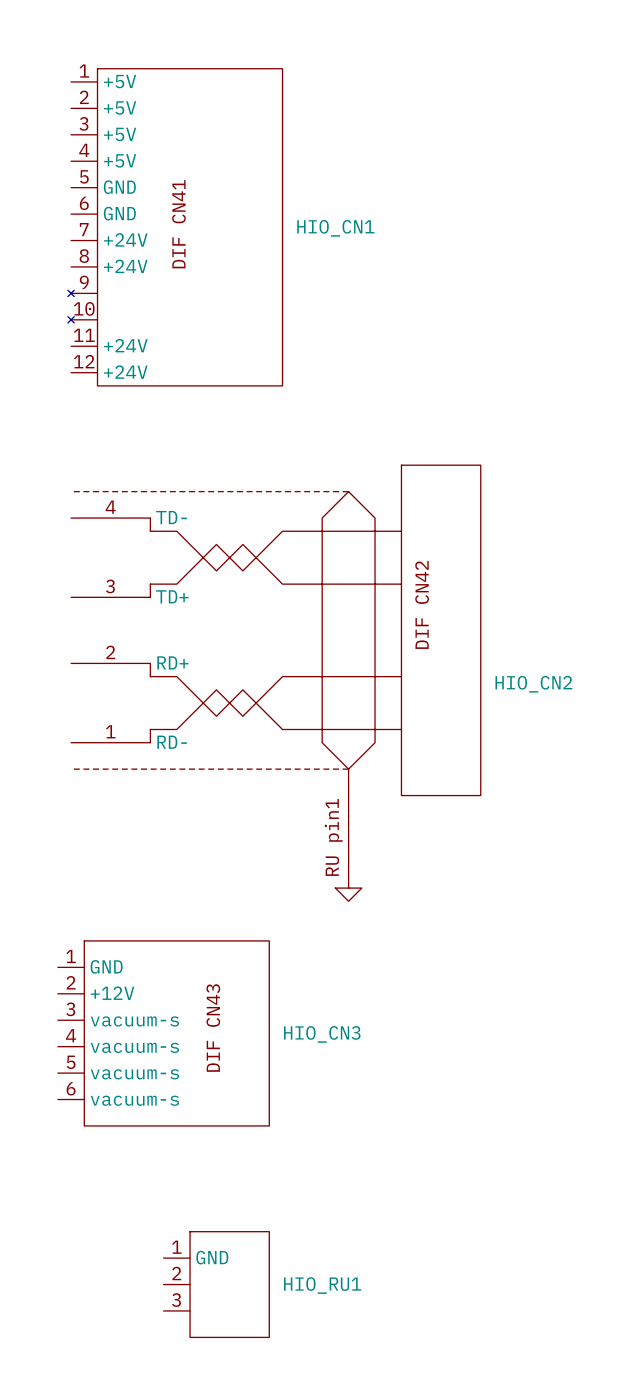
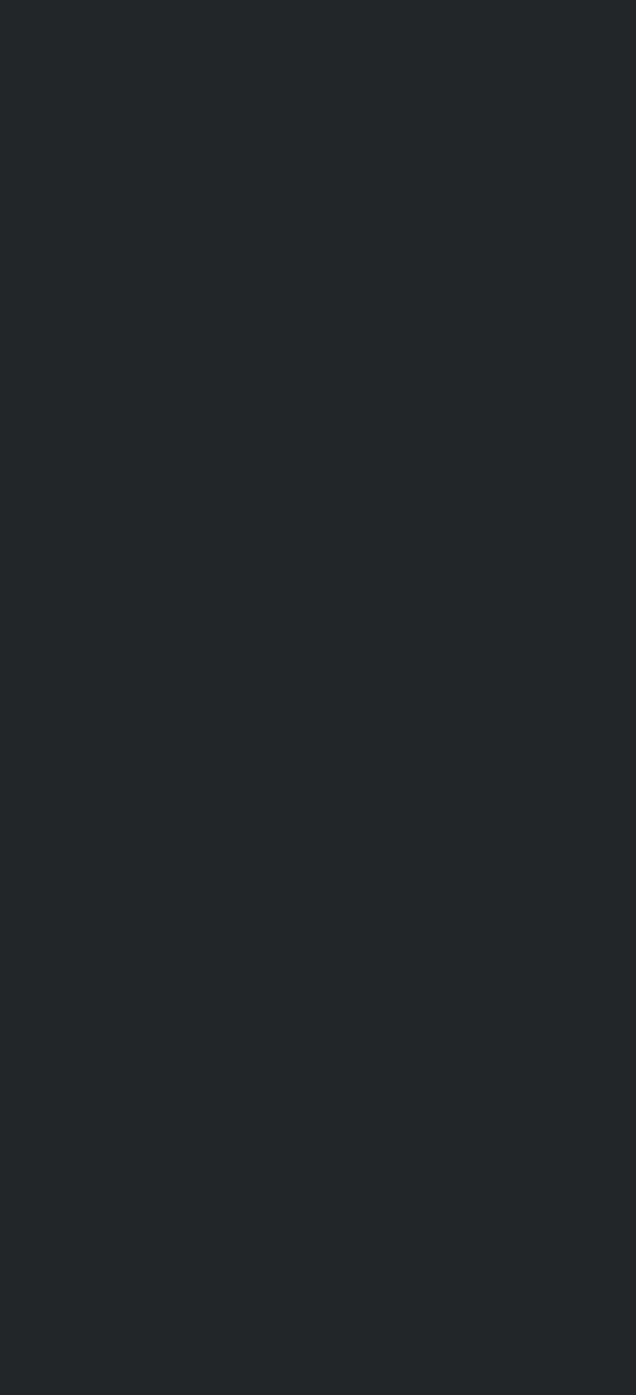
HIO_CN1: (175, 227) -> none
HIO_CN2: (275, 683) -> none
HIO_CN3: (163, 1033) -> none
HIO_RU1: (216, 1284) -> none

